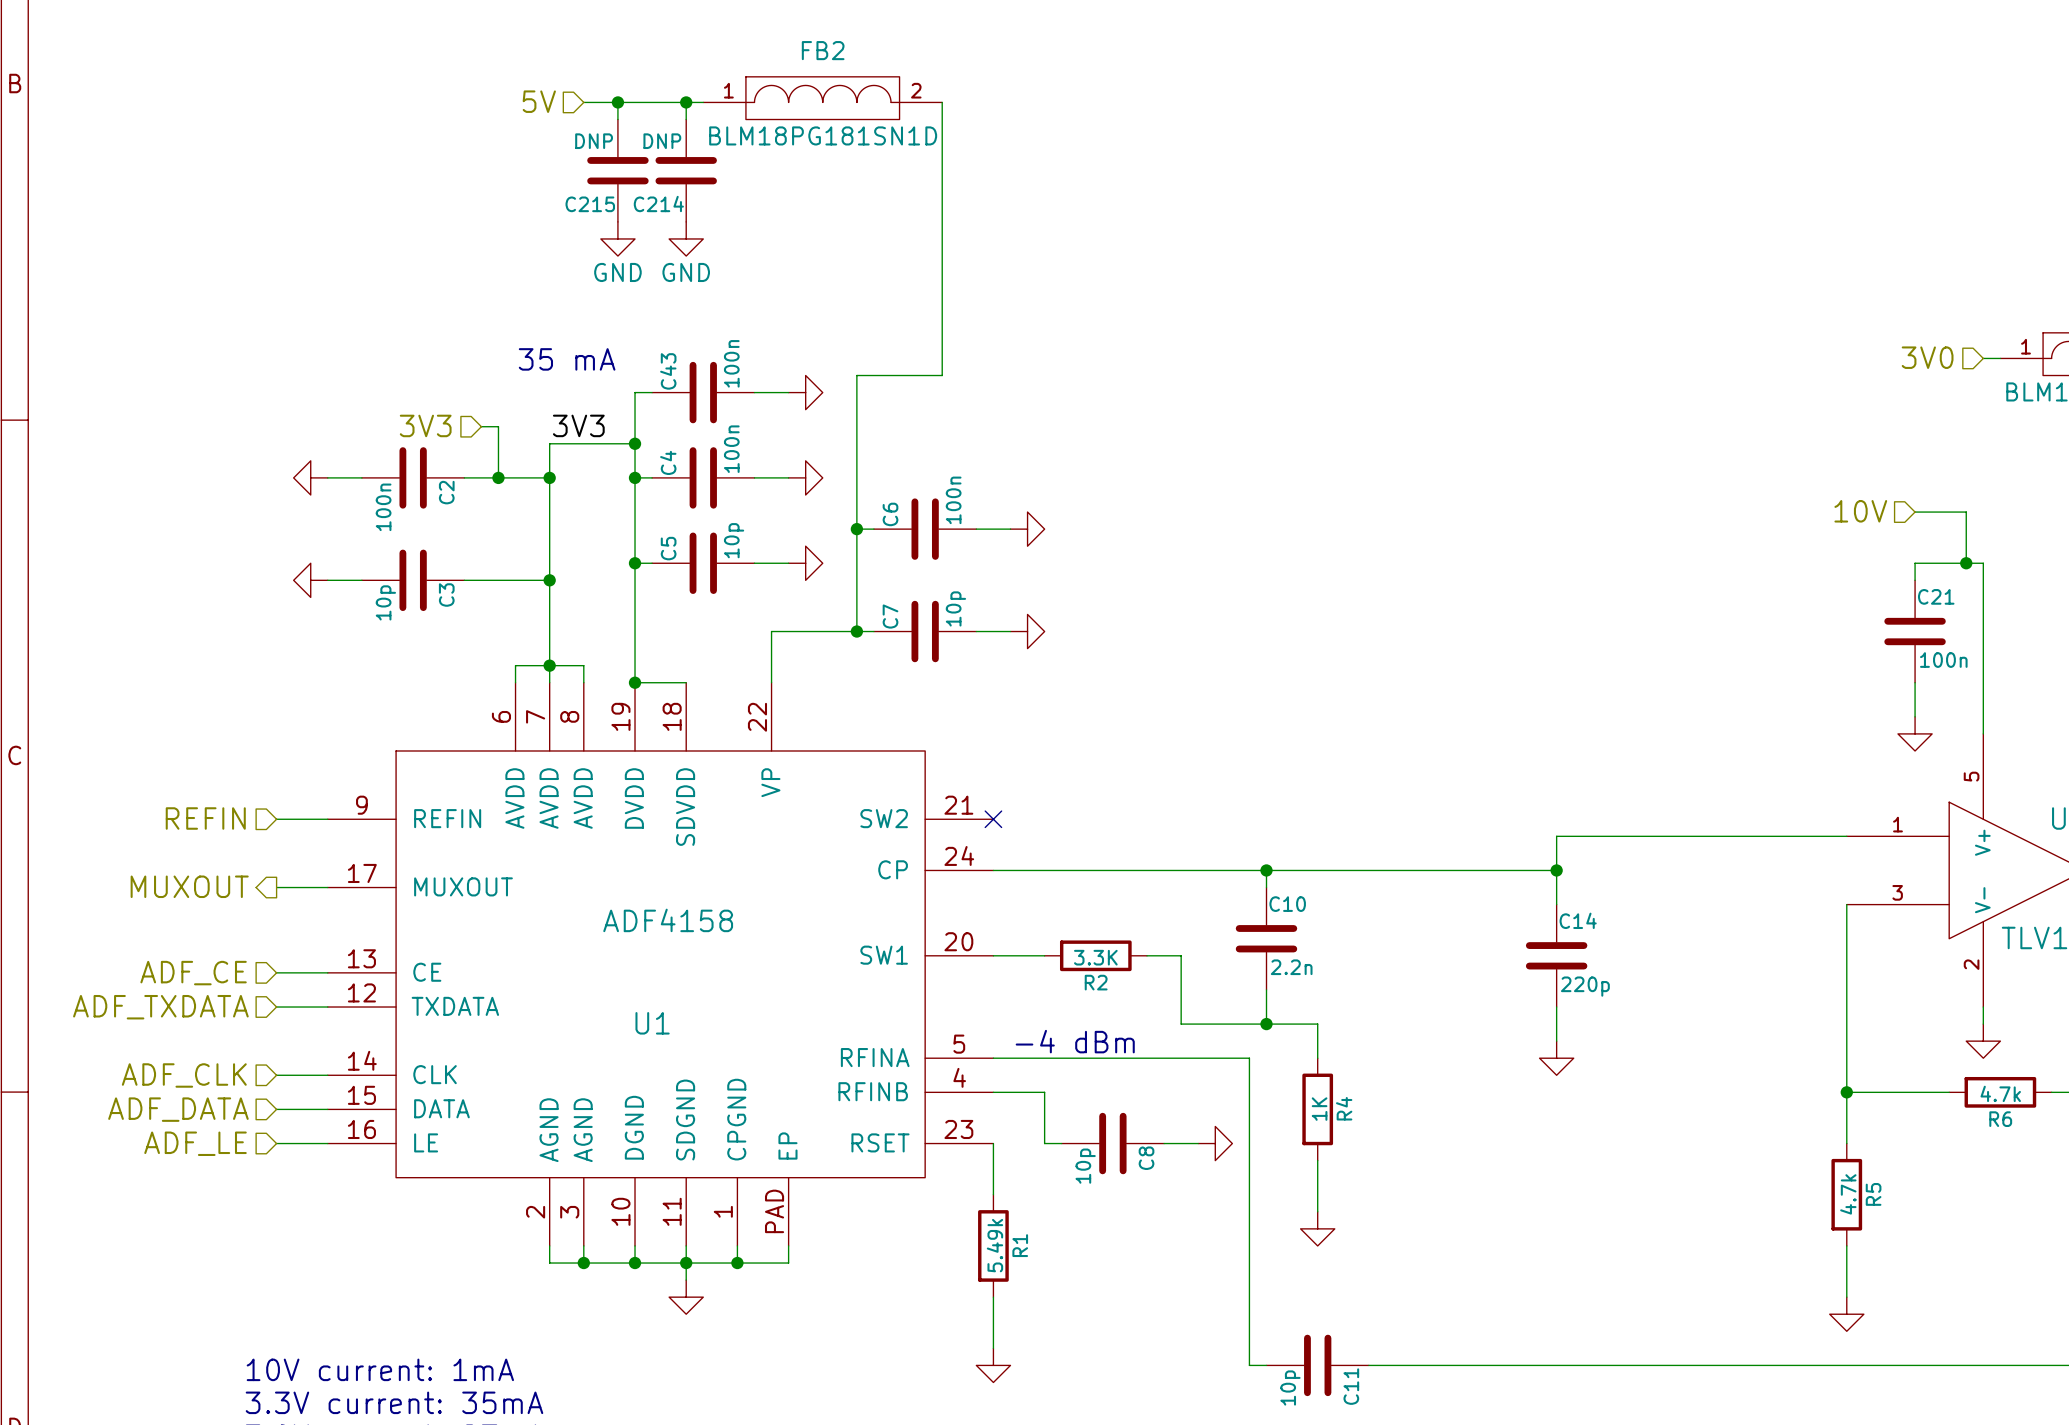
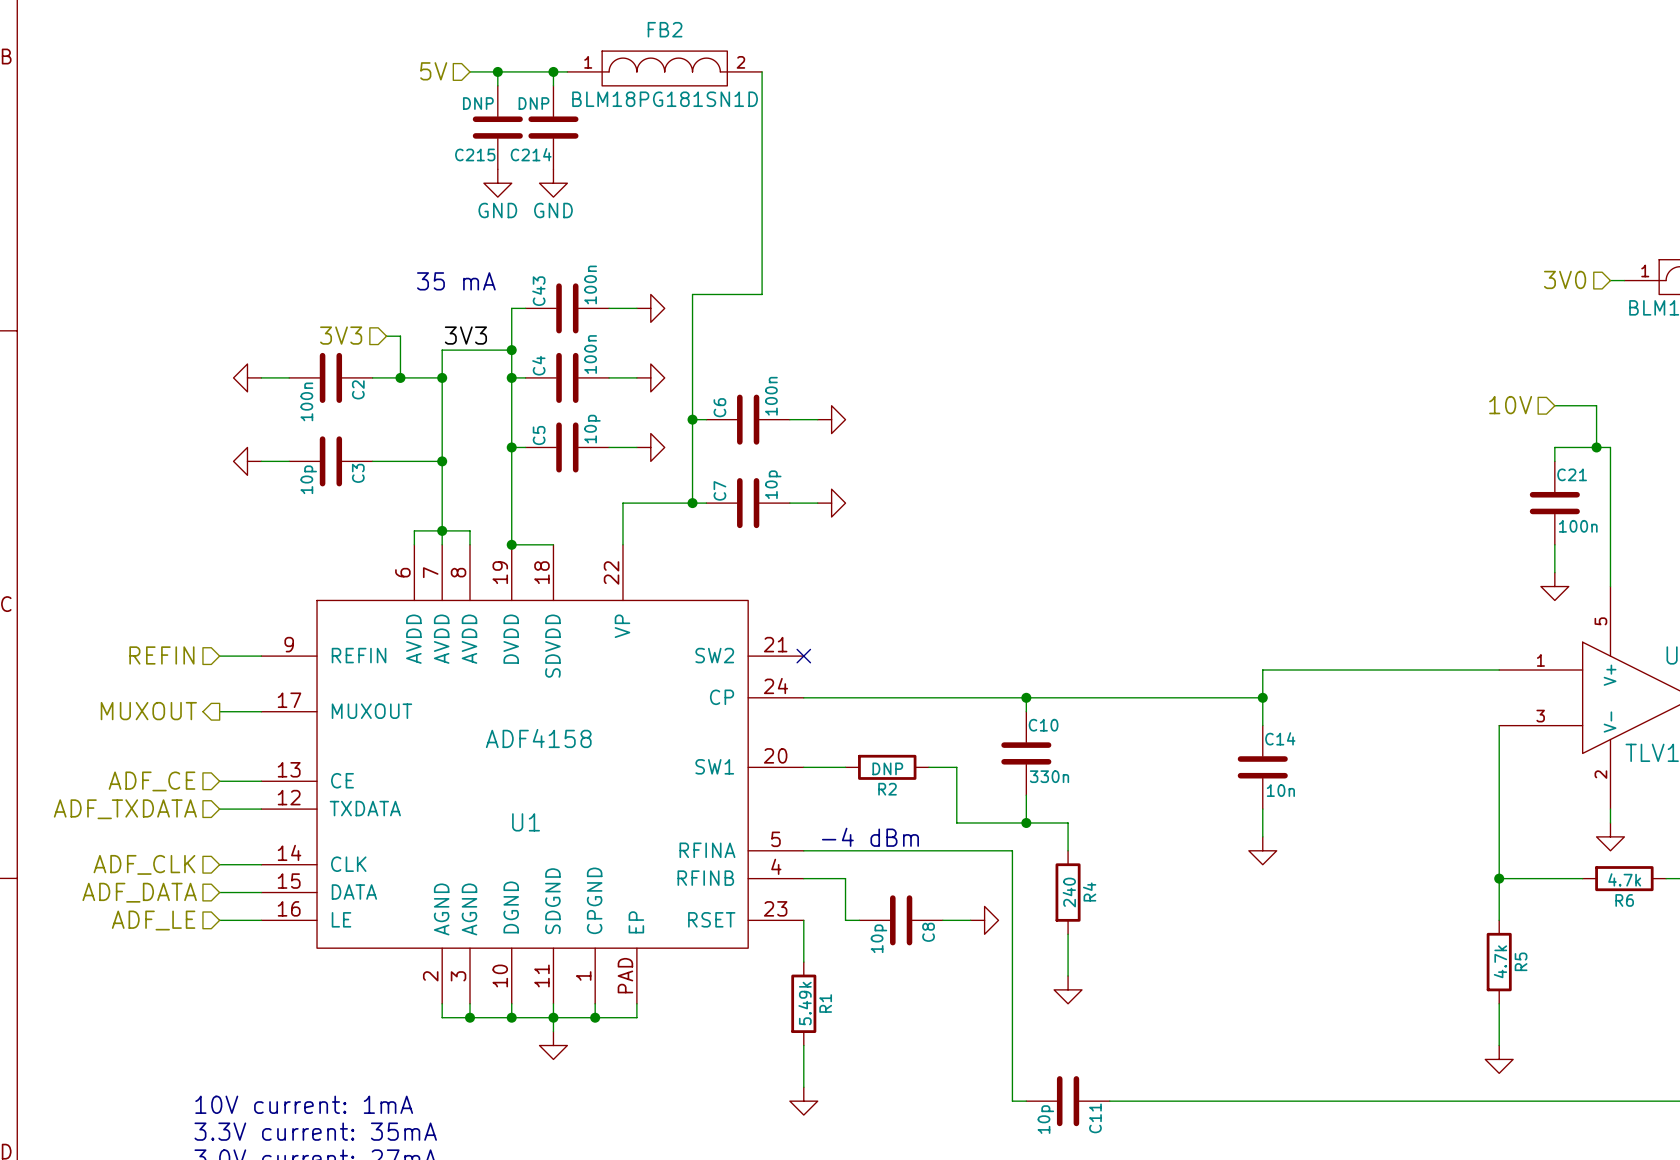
R2 value: 3.3K (1095, 957) -> DNP (887, 768)
C10 value: 2.2n (1291, 967) -> 330n (1049, 776)
C14 value: 220p (1585, 986) -> 10n (1280, 790)
R4 value: 1K (1319, 1109) -> 240 (1069, 892)

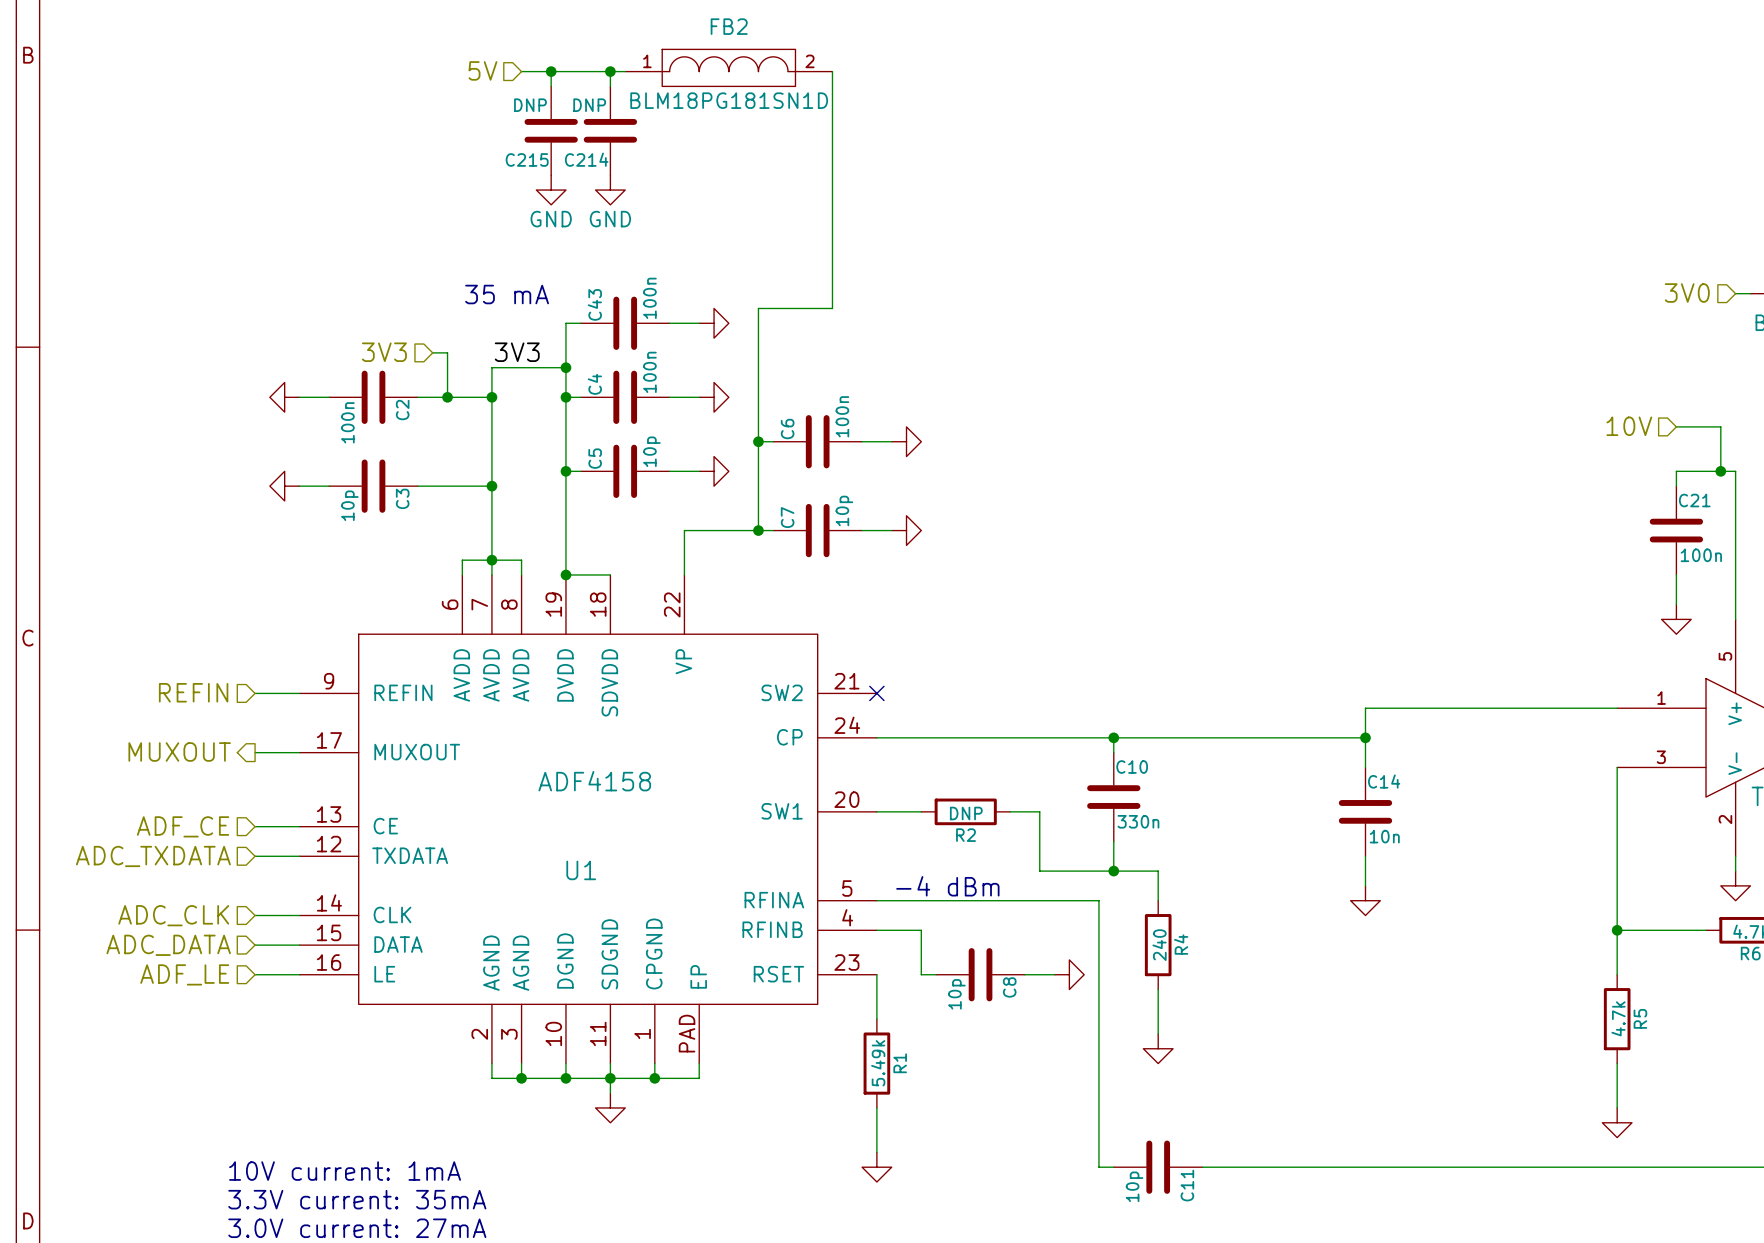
hierarchical label: ADF_TXDATA (125, 809) -> ADC_TXDATA (153, 856)
hierarchical label: ADF_CLK (144, 864) -> ADC_CLK (173, 915)
hierarchical label: ADF_DATA (139, 892) -> ADC_DATA (168, 945)

